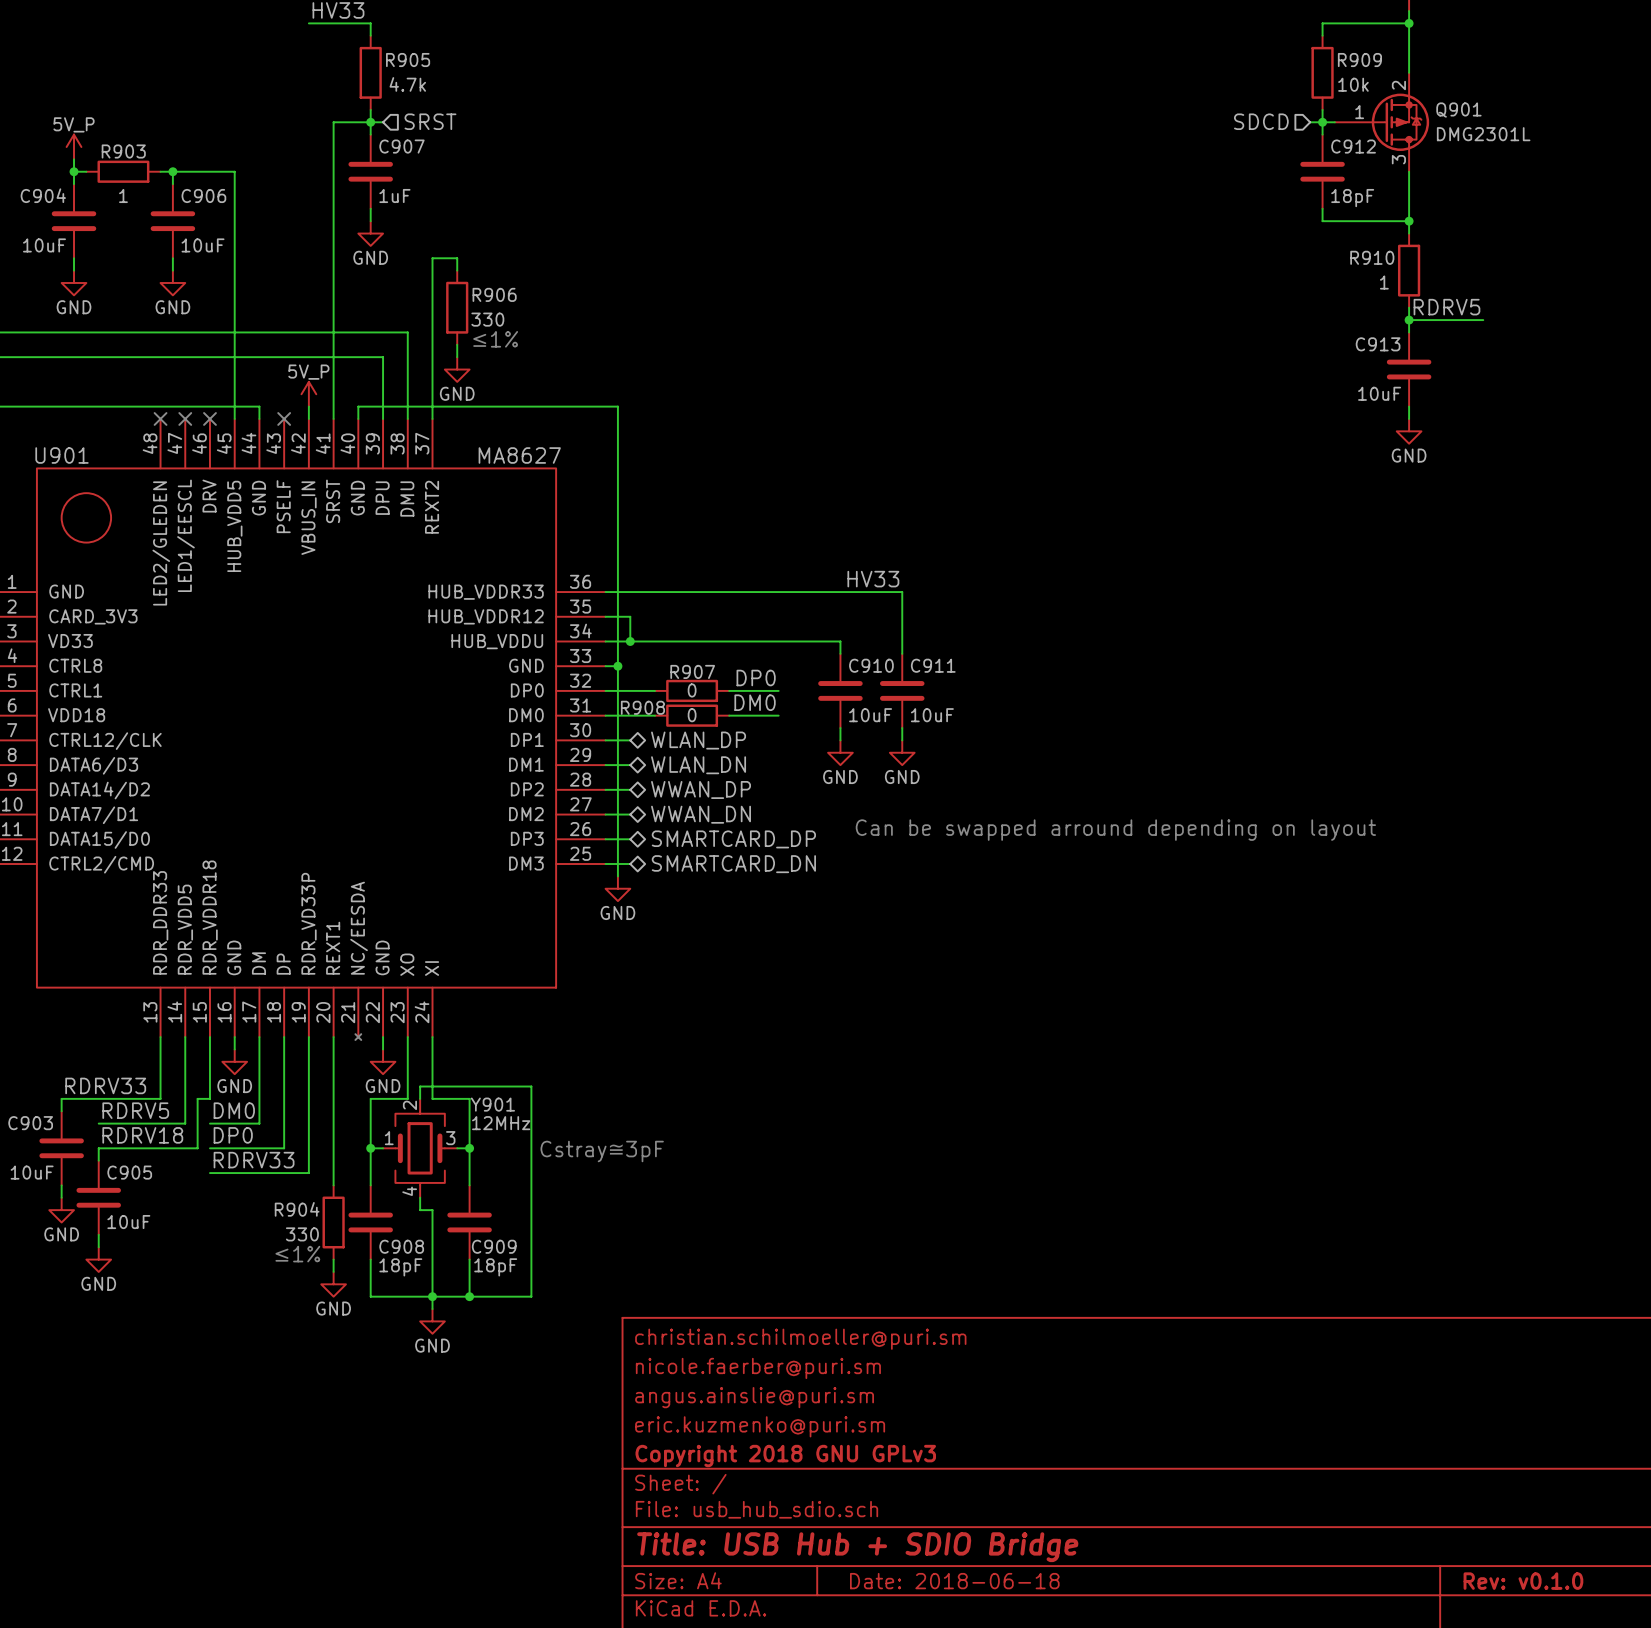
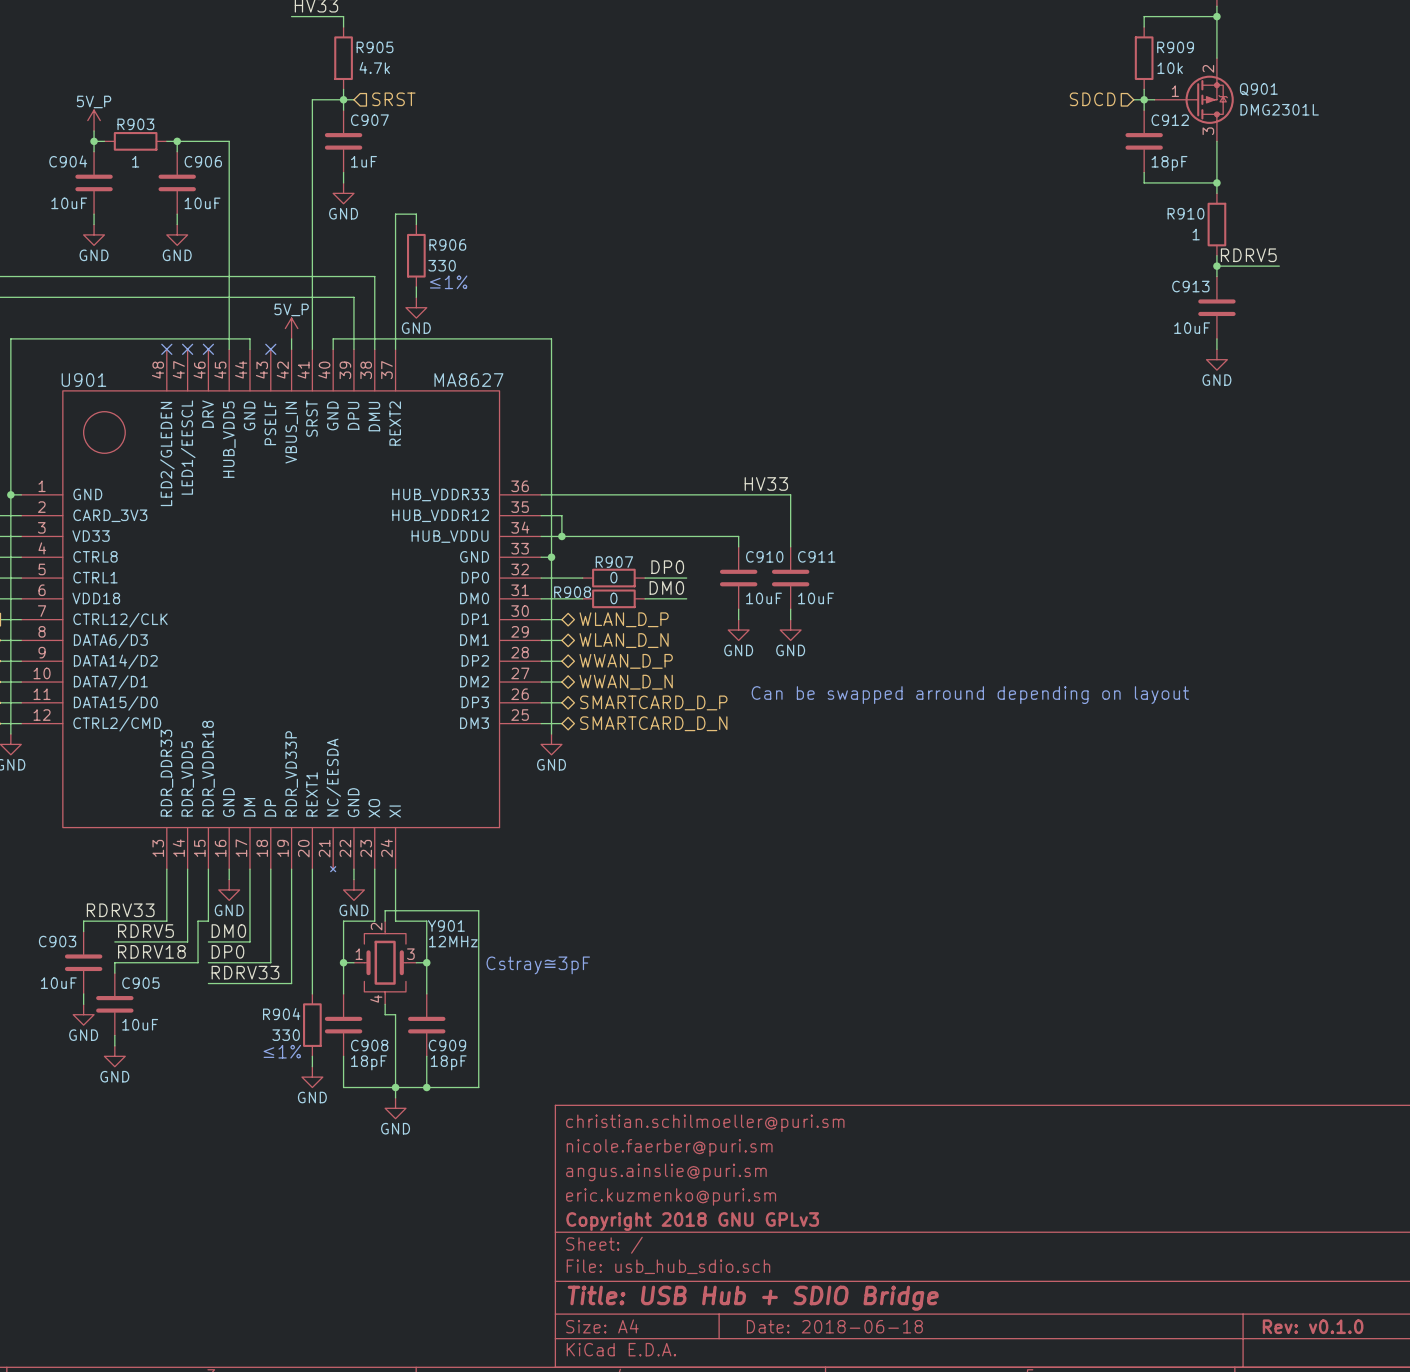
hierarchical label: WLAN_DP (698, 740) -> WLAN_D_P (624, 619)
hierarchical label: WLAN_DN (698, 765) -> WLAN_D_N (624, 640)
hierarchical label: WWAN_DP (701, 789) -> WWAN_D_P (626, 661)
hierarchical label: WWAN_DN (701, 814) -> WWAN_D_N (626, 682)
hierarchical label: SMARTCARD_DP (733, 839) -> SMARTCARD_D_P (653, 702)
hierarchical label: SMARTCARD_DN (733, 864) -> SMARTCARD_D_N (653, 723)

